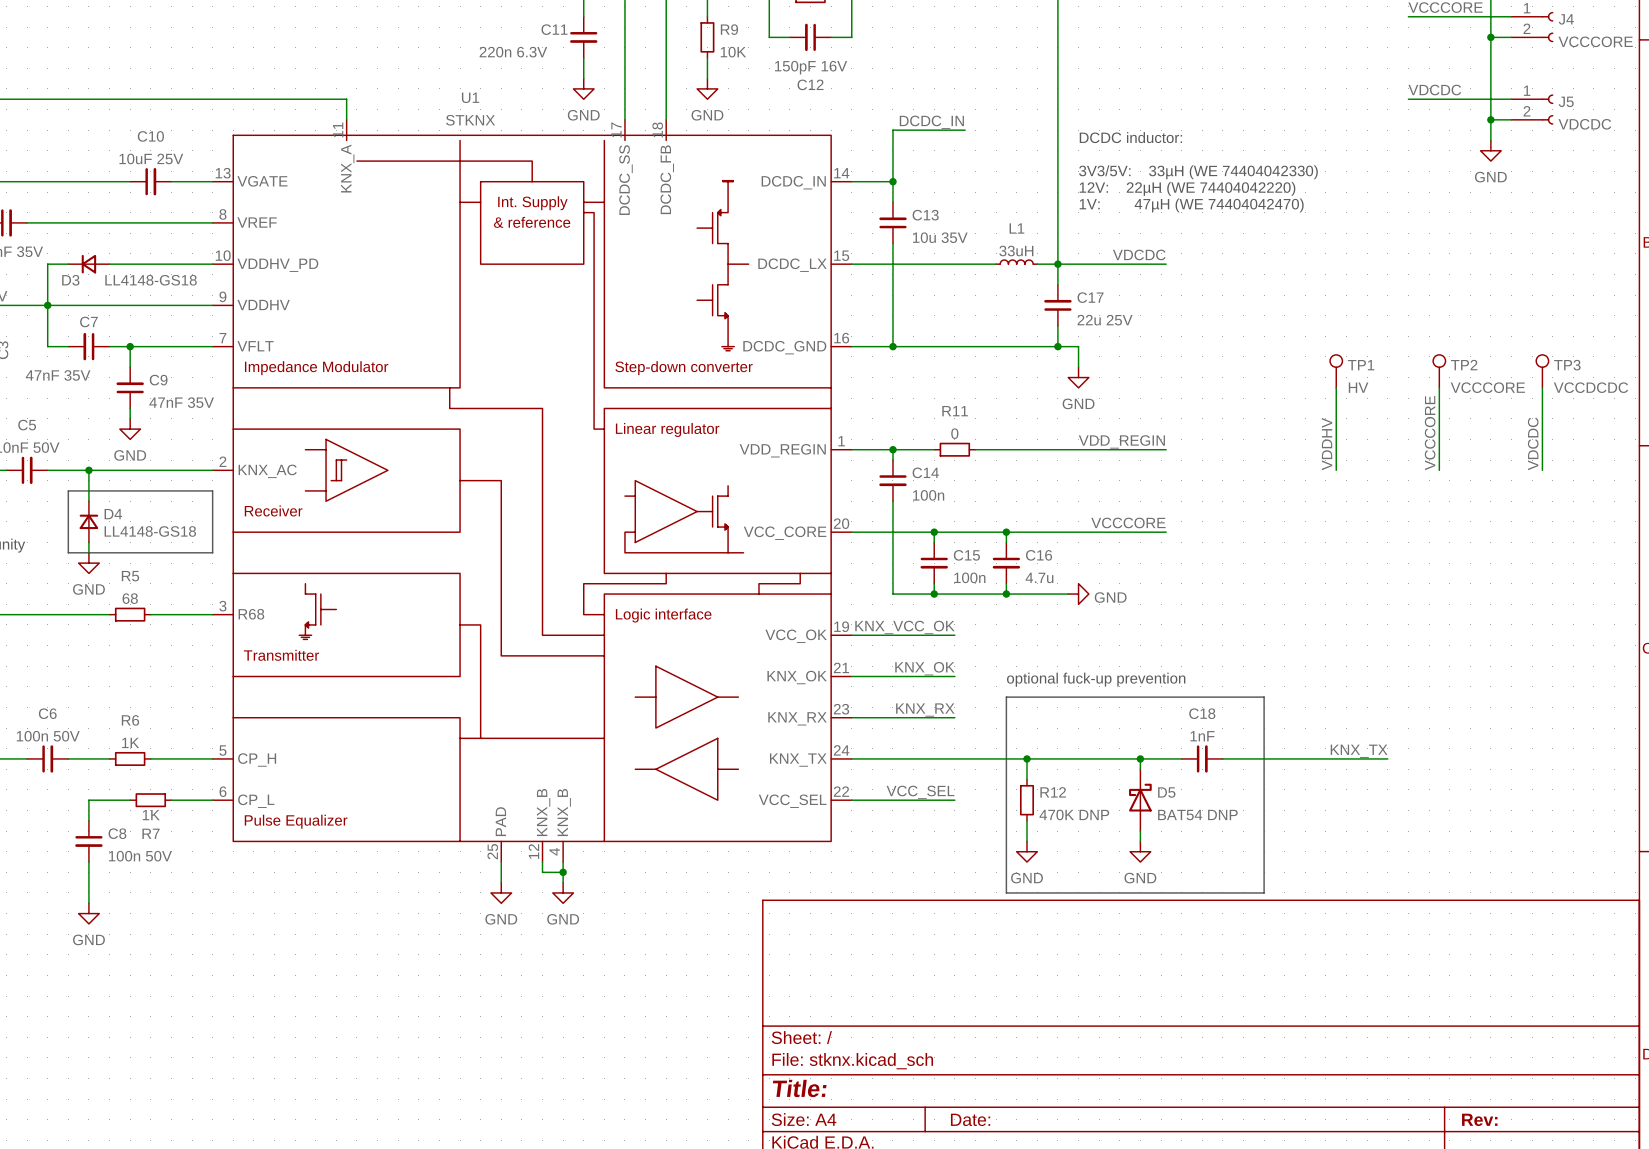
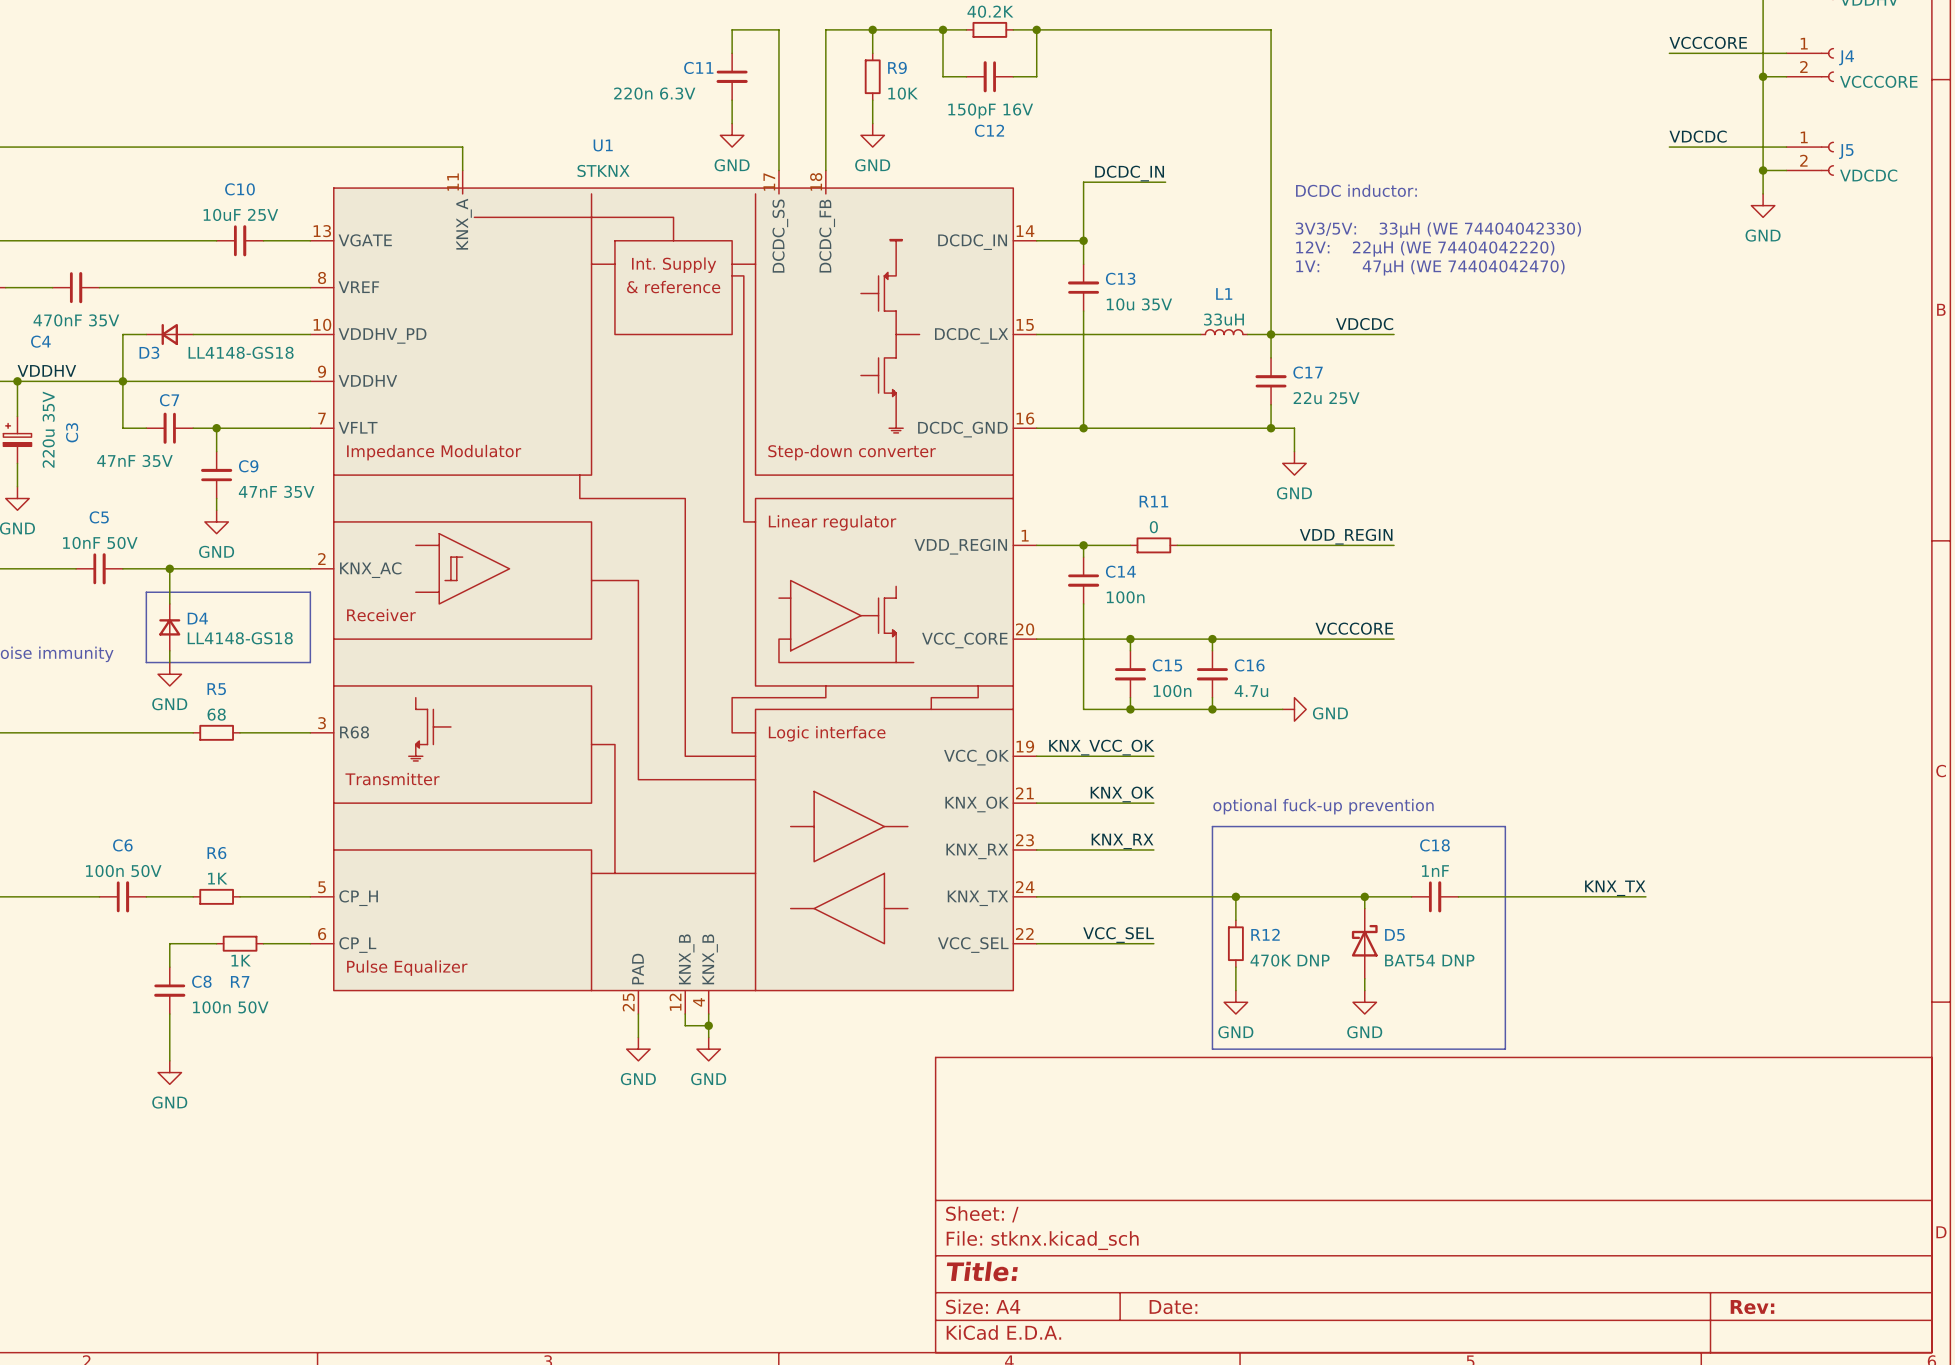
TP1: HV (1336, 371) -> none
TP2: VCCCORE (1439, 371) -> none
TP3: VCCDCDC (1542, 371) -> none
wire: (1336, 387) (1336, 470) -> none
wire: (1439, 387) (1439, 470) -> none
wire: (1542, 387) (1542, 470) -> none
label: VCCCORE (1430, 433) -> none
label: VDCDC (1533, 443) -> none
label: VDDHV (1327, 444) -> none

